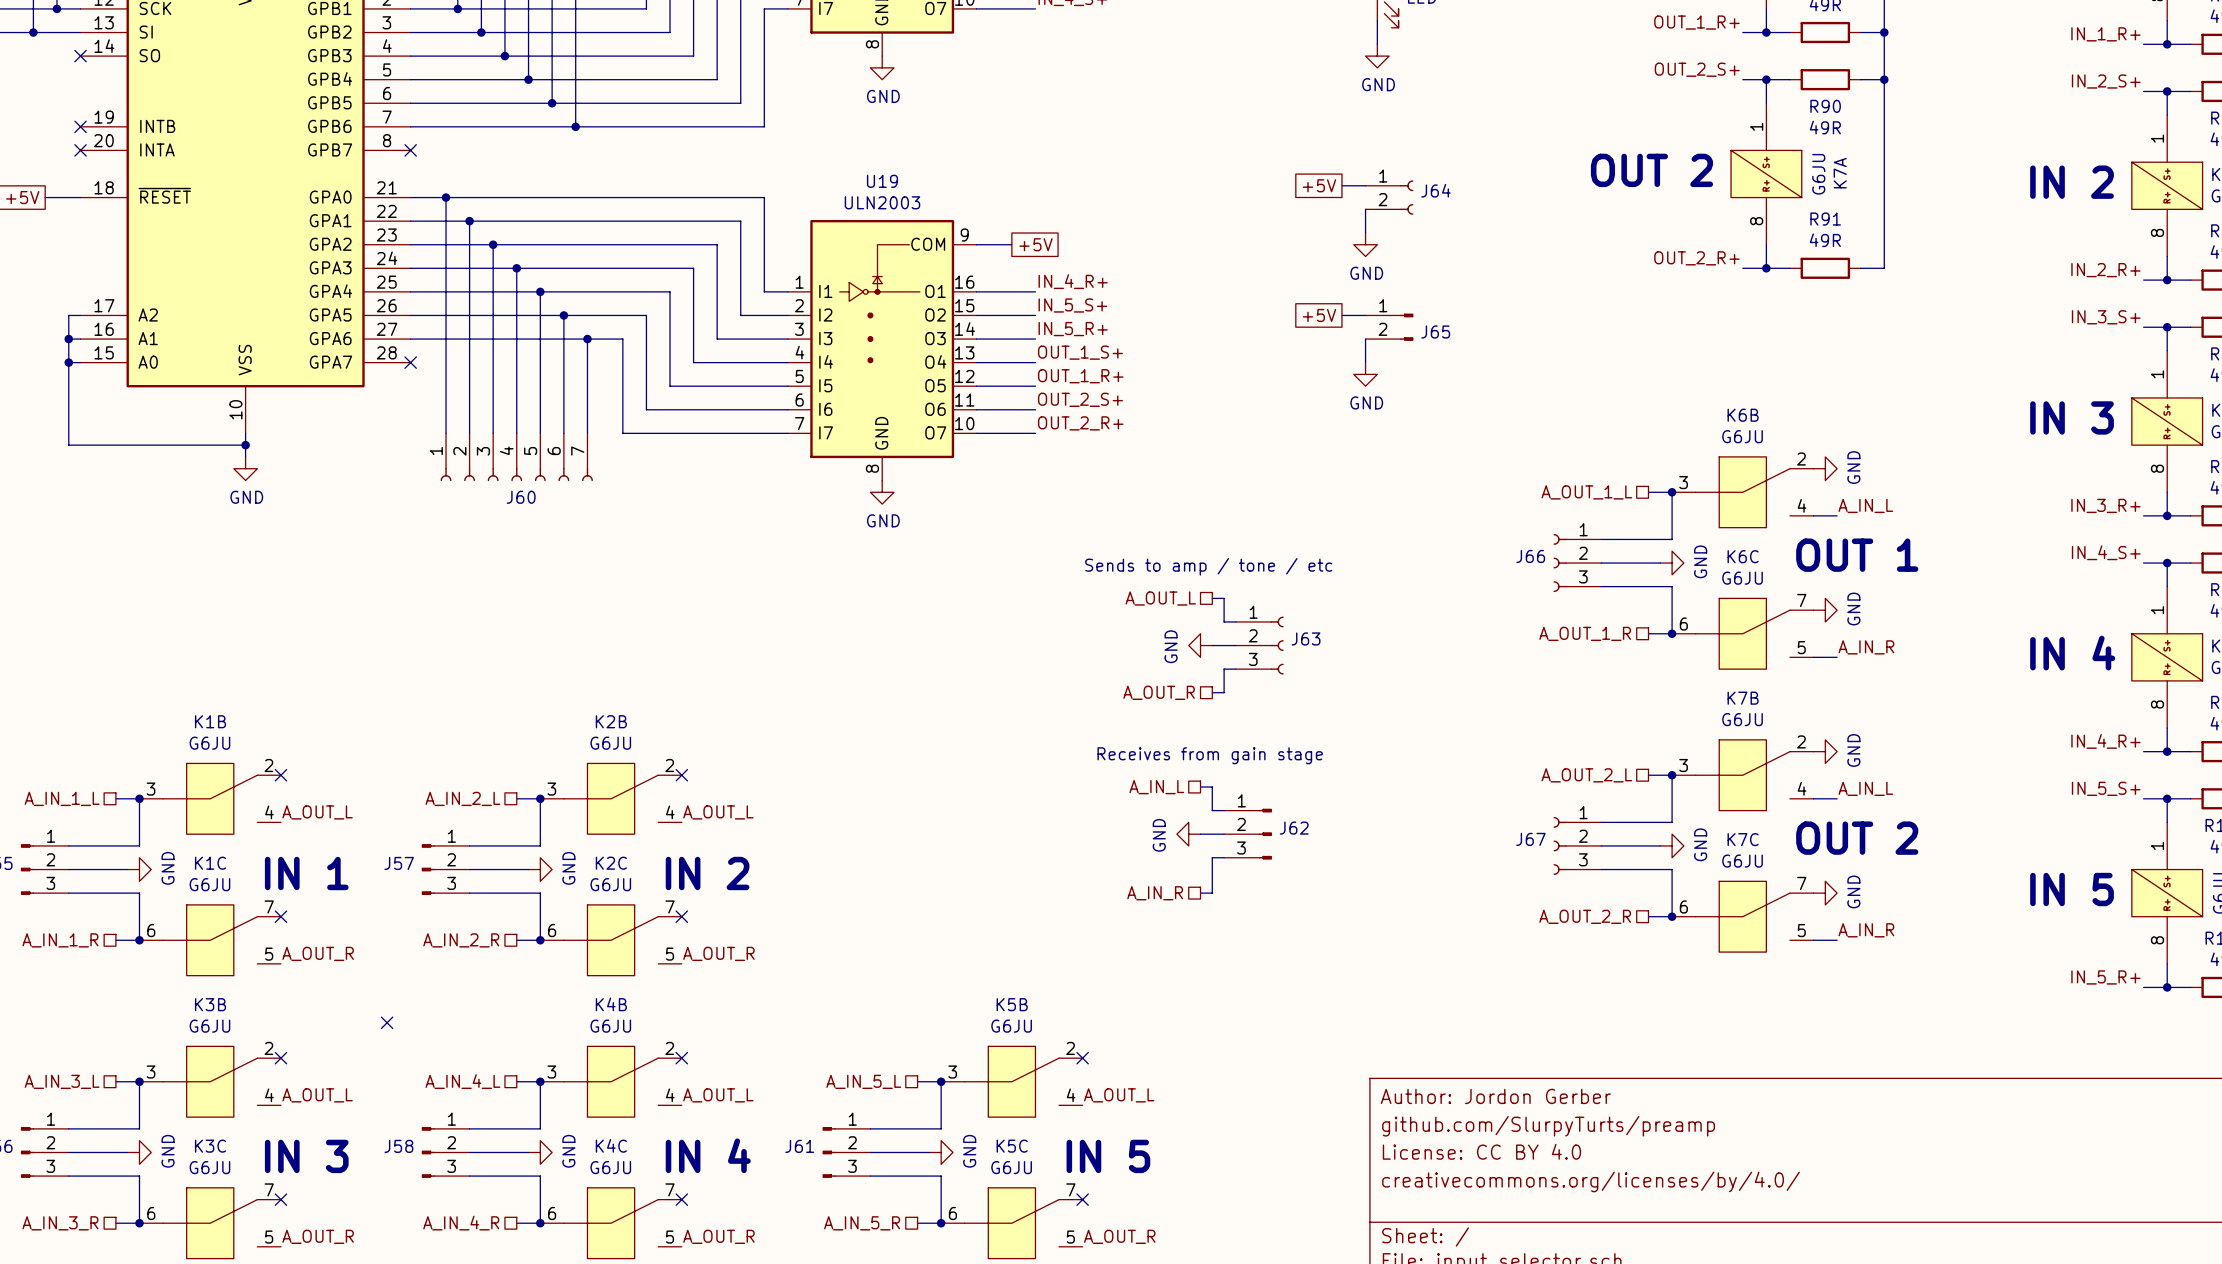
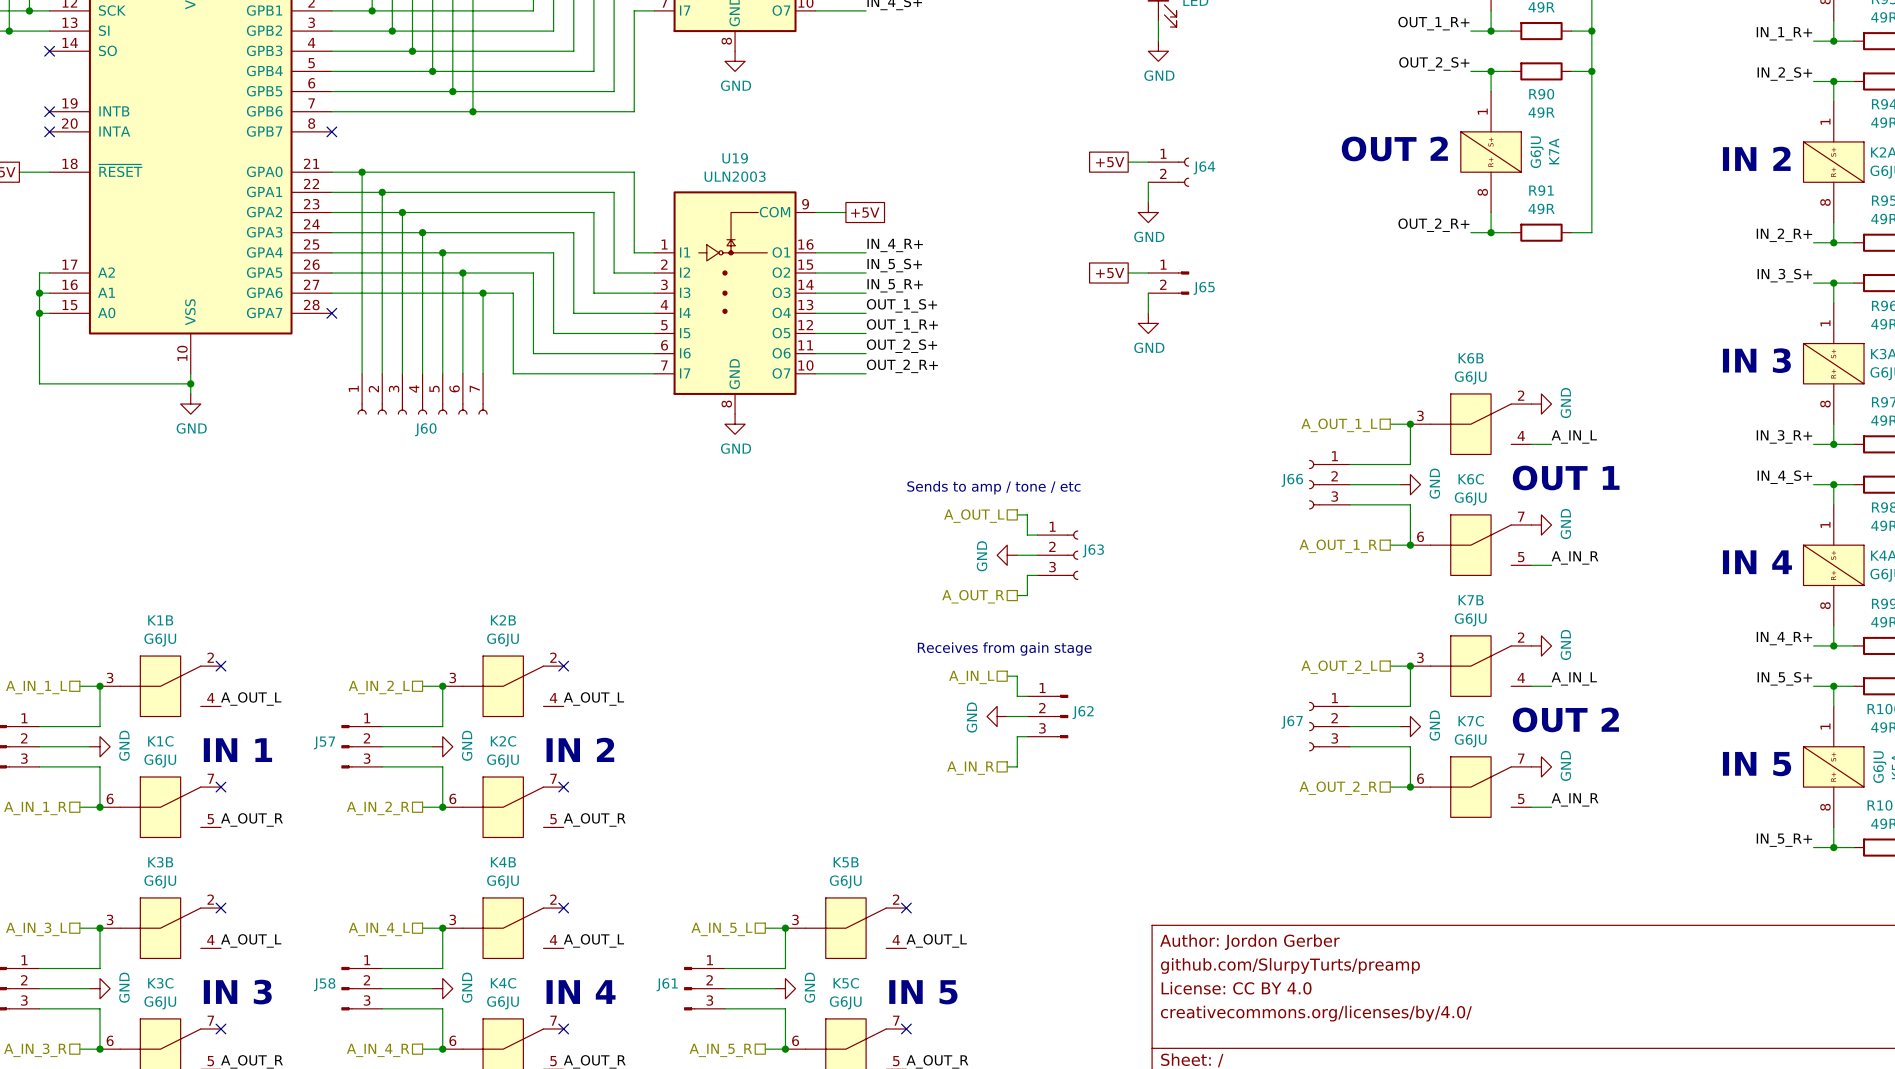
no-connect mark: (387, 1022) -> none

